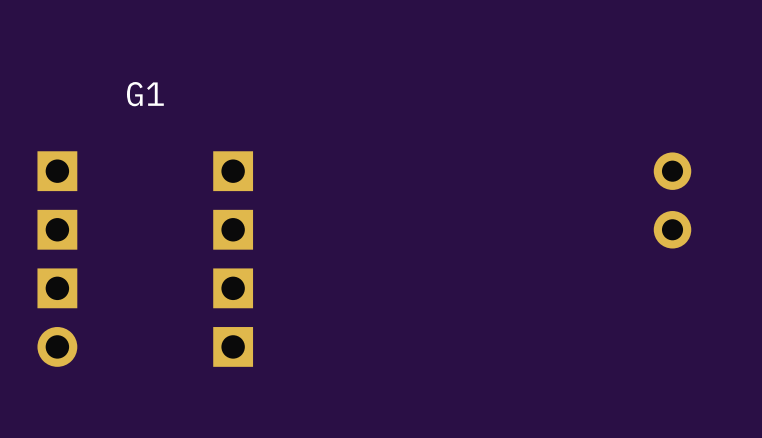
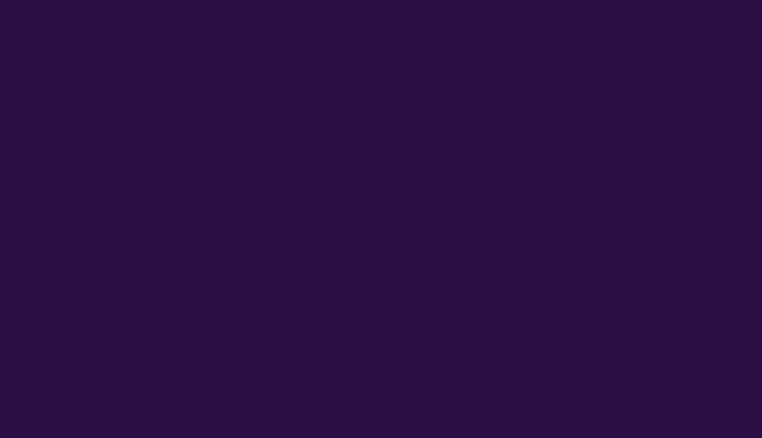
part: (672, 200) -> none
G1: (145, 259) -> none

